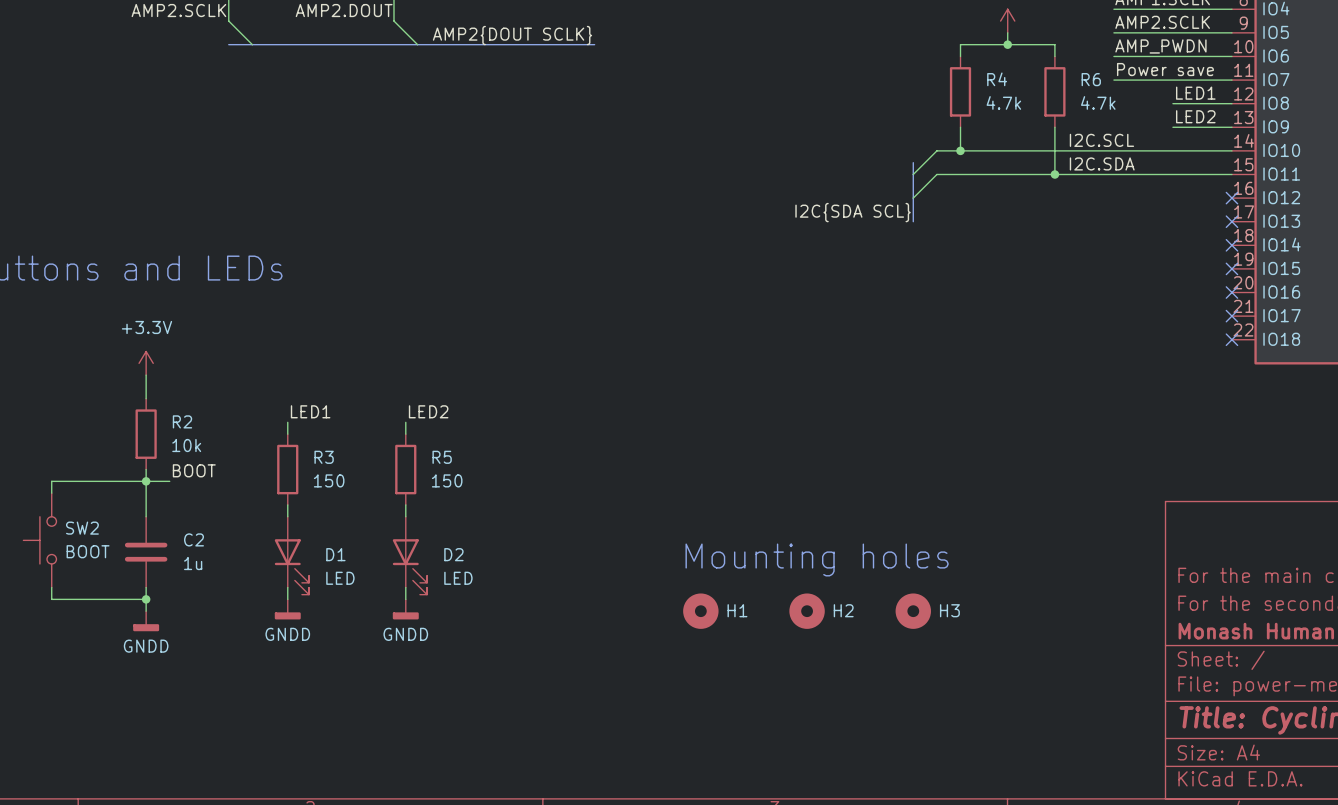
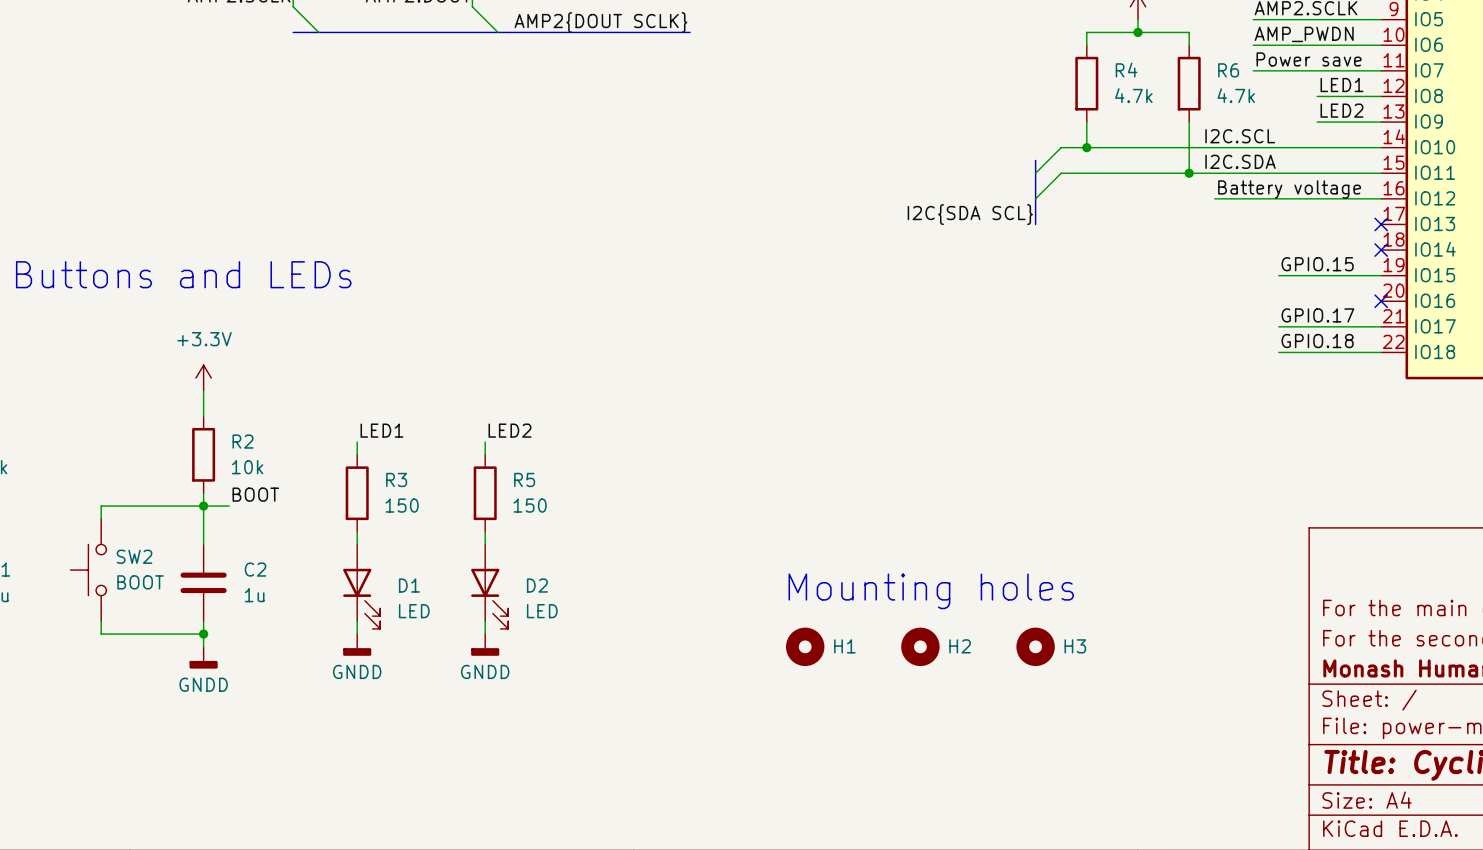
label: none -> Battery voltage (1289, 189)
wire: none -> (1214, 198) (1381, 198)
no-connect mark: (1231, 198) -> none
label: none -> GPIO.15 (1317, 264)
wire: none -> (1278, 275) (1381, 275)
no-connect mark: (1231, 268) -> none
label: none -> GPIO.17 (1317, 315)
wire: none -> (1278, 326) (1381, 326)
no-connect mark: (1231, 316) -> none
label: none -> GPIO.18 (1317, 341)
wire: none -> (1278, 352) (1381, 352)
no-connect mark: (1231, 339) -> none

